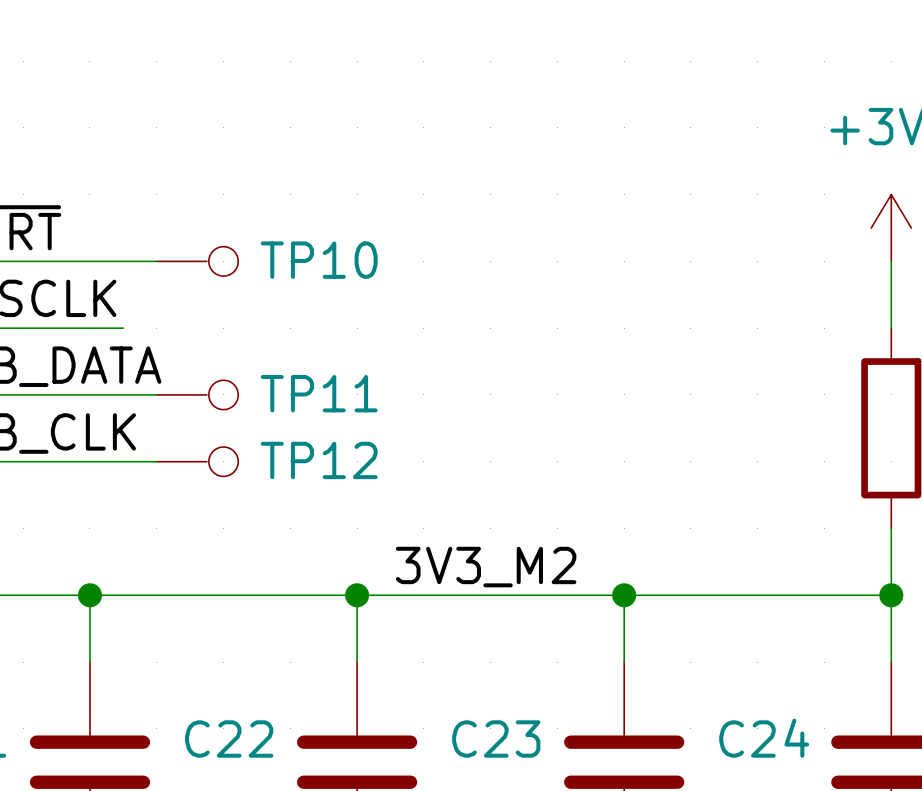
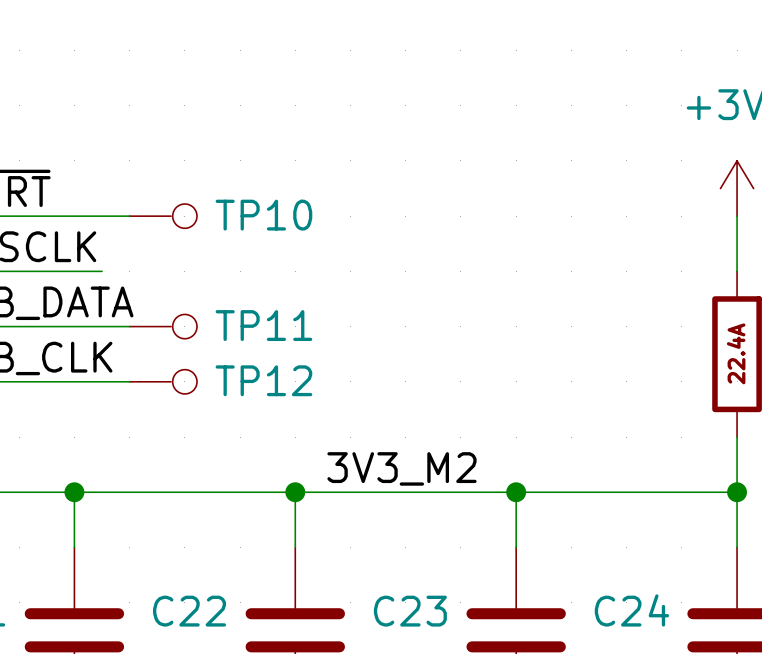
part text: none -> 22.4A (736, 353)

